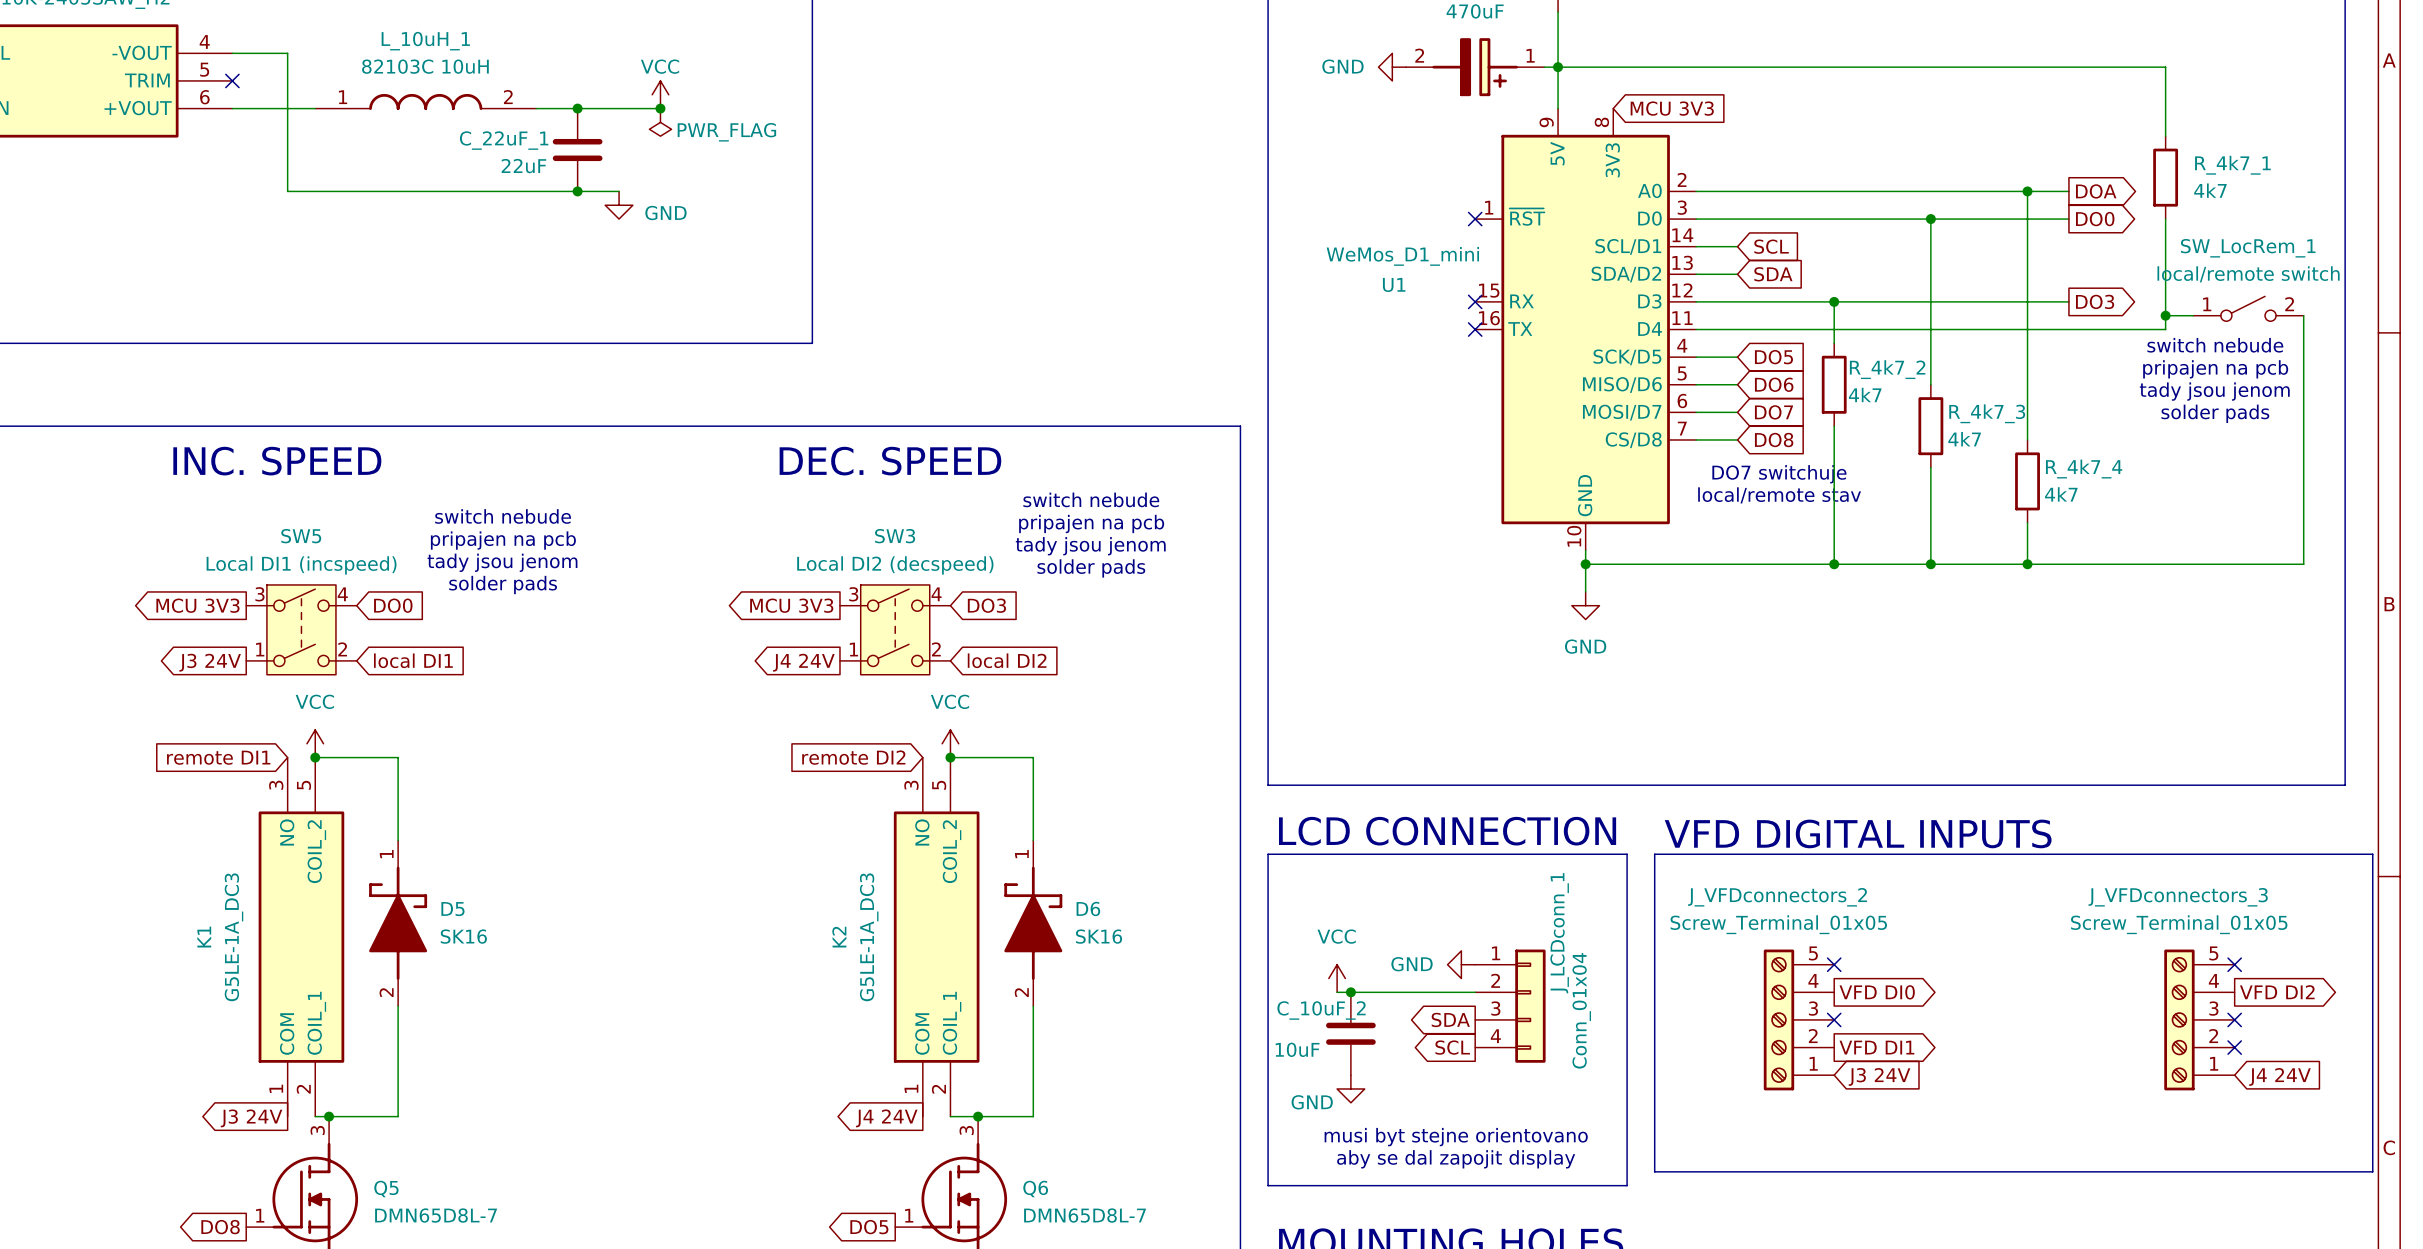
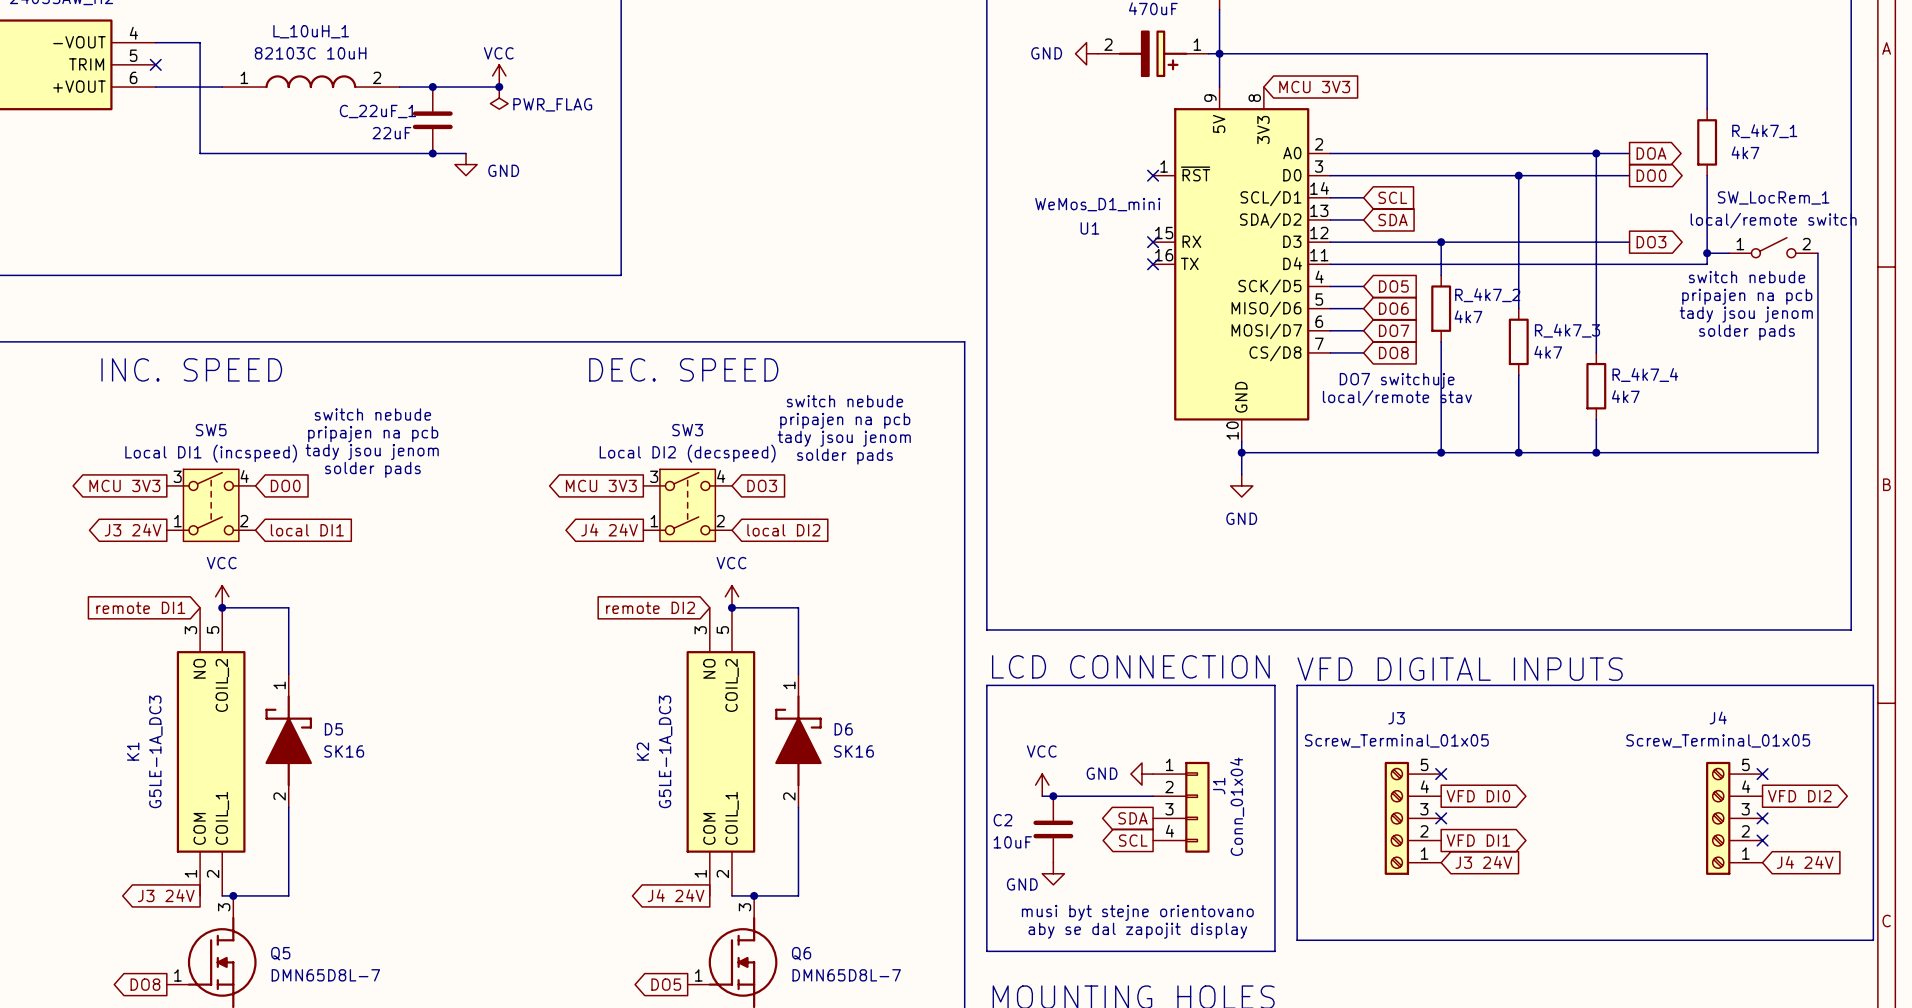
J_VFDconnectors_2 name: J_VFDconnectors_2 (1777, 897) -> J3 (1396, 718)
J_VFDconnectors_3 name: J_VFDconnectors_3 (2178, 897) -> J4 (1718, 717)
J_LCDconn_1 name: J_LCDconn_1 (1559, 933) -> J1 (1219, 786)
C_10uF_2 name: C_10uF_2 (1321, 1010) -> C2 (1002, 820)

